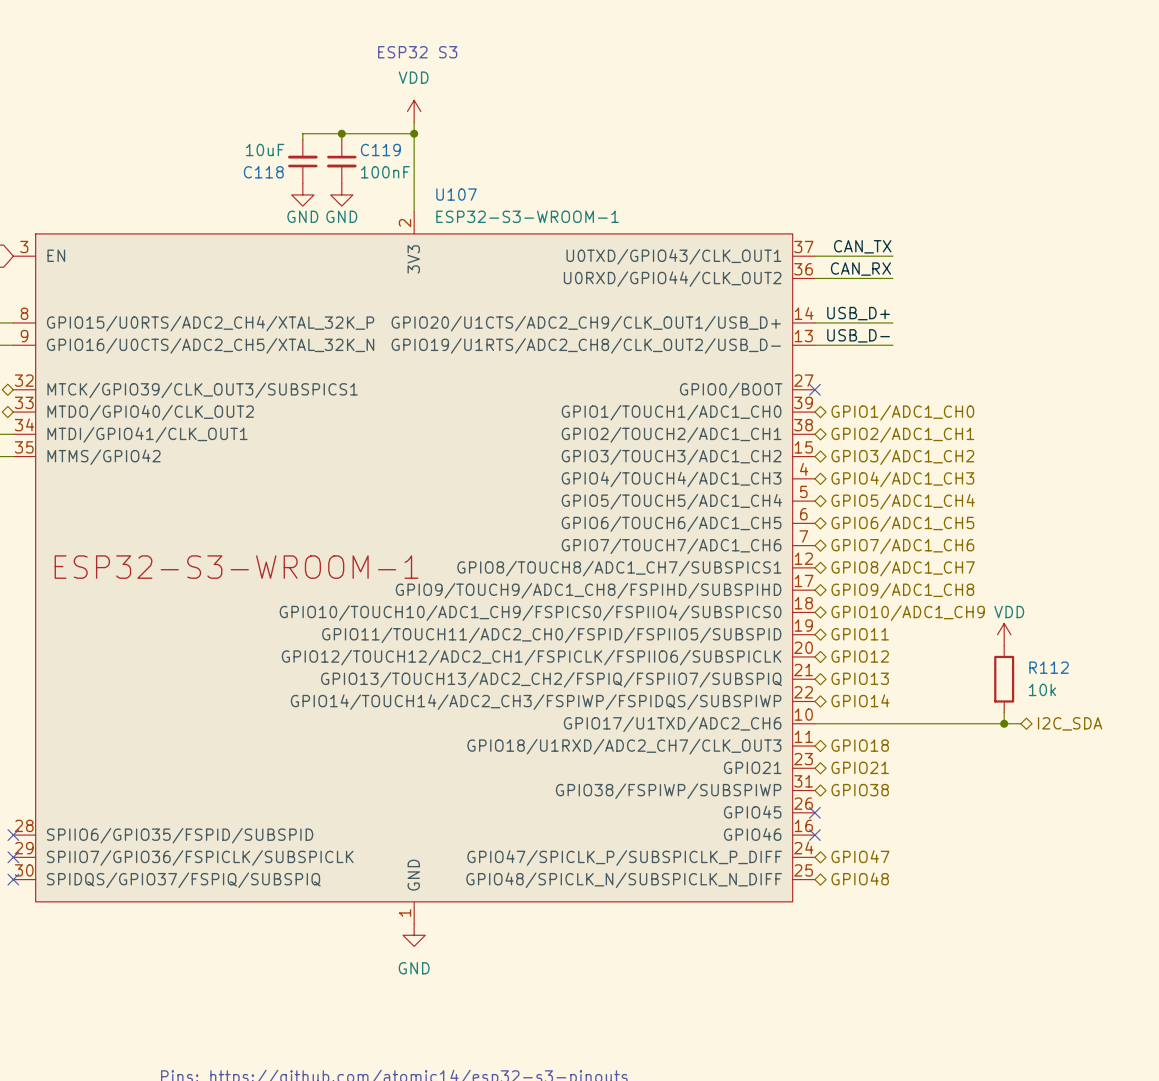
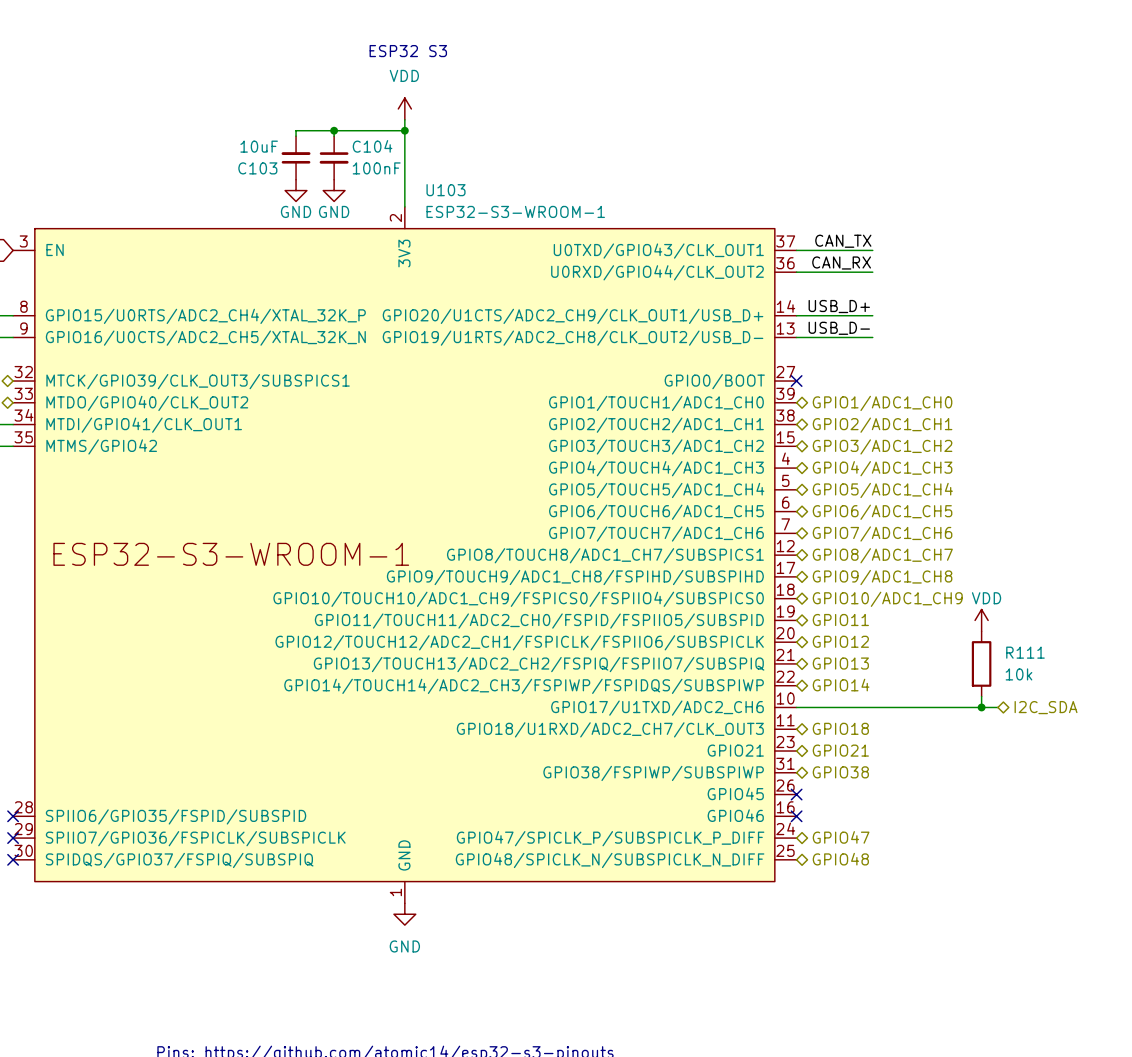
C119 name: C119 (380, 150) -> C104 (372, 146)
C118 name: C118 (263, 172) -> C103 (257, 168)
U107 name: U107 (456, 194) -> U103 (446, 190)
R112 name: R112 (1049, 667) -> R111 (1025, 652)

